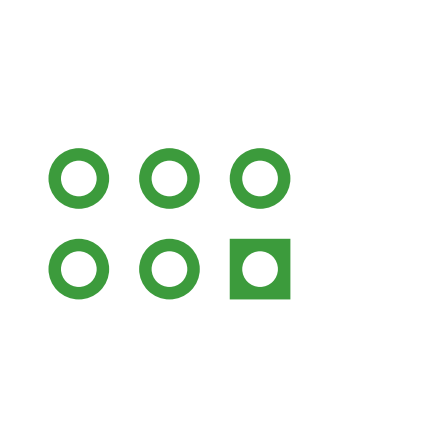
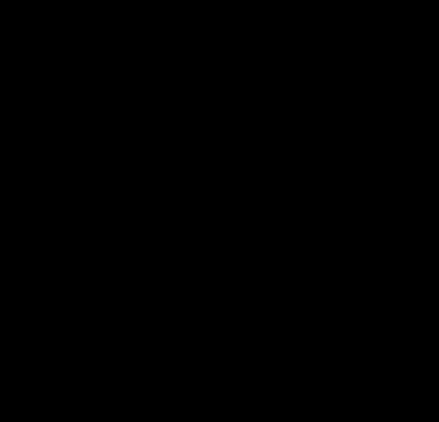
part: (169, 223) -> none

